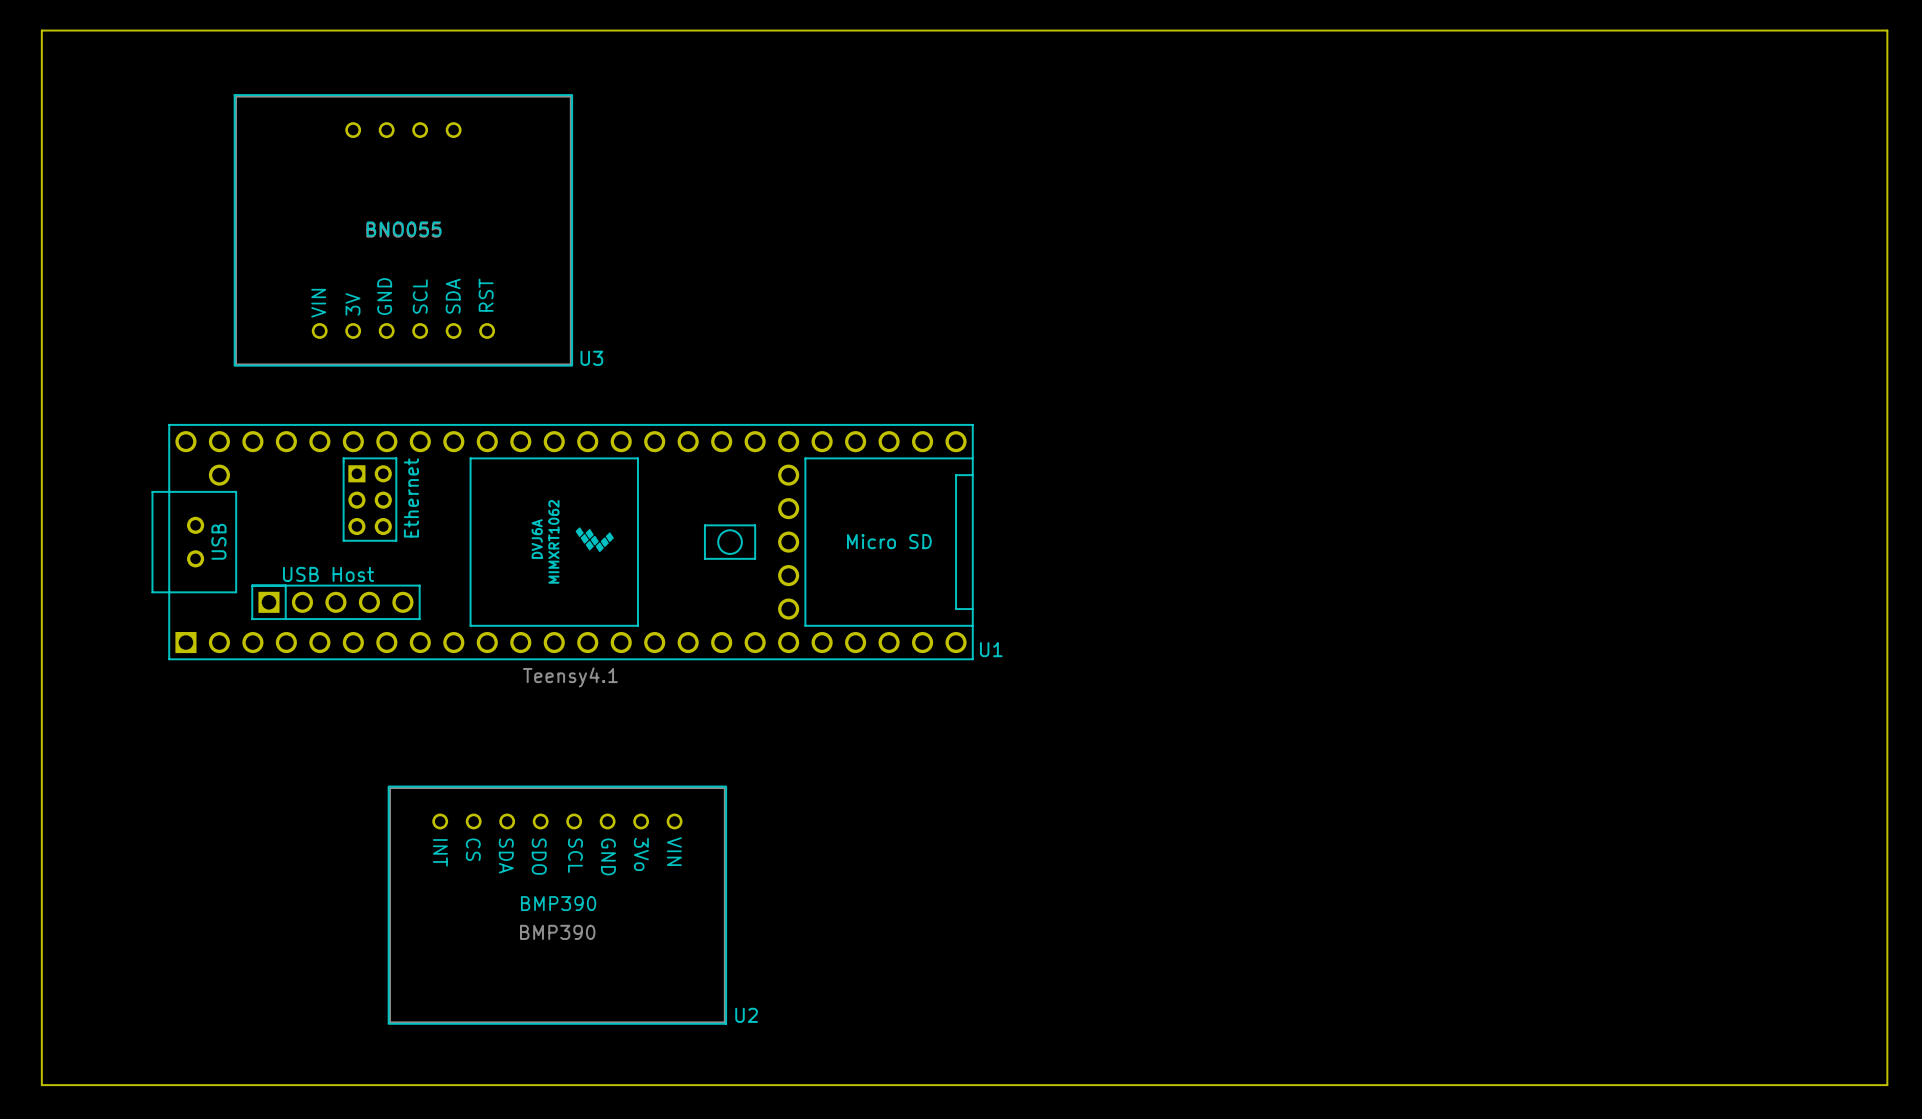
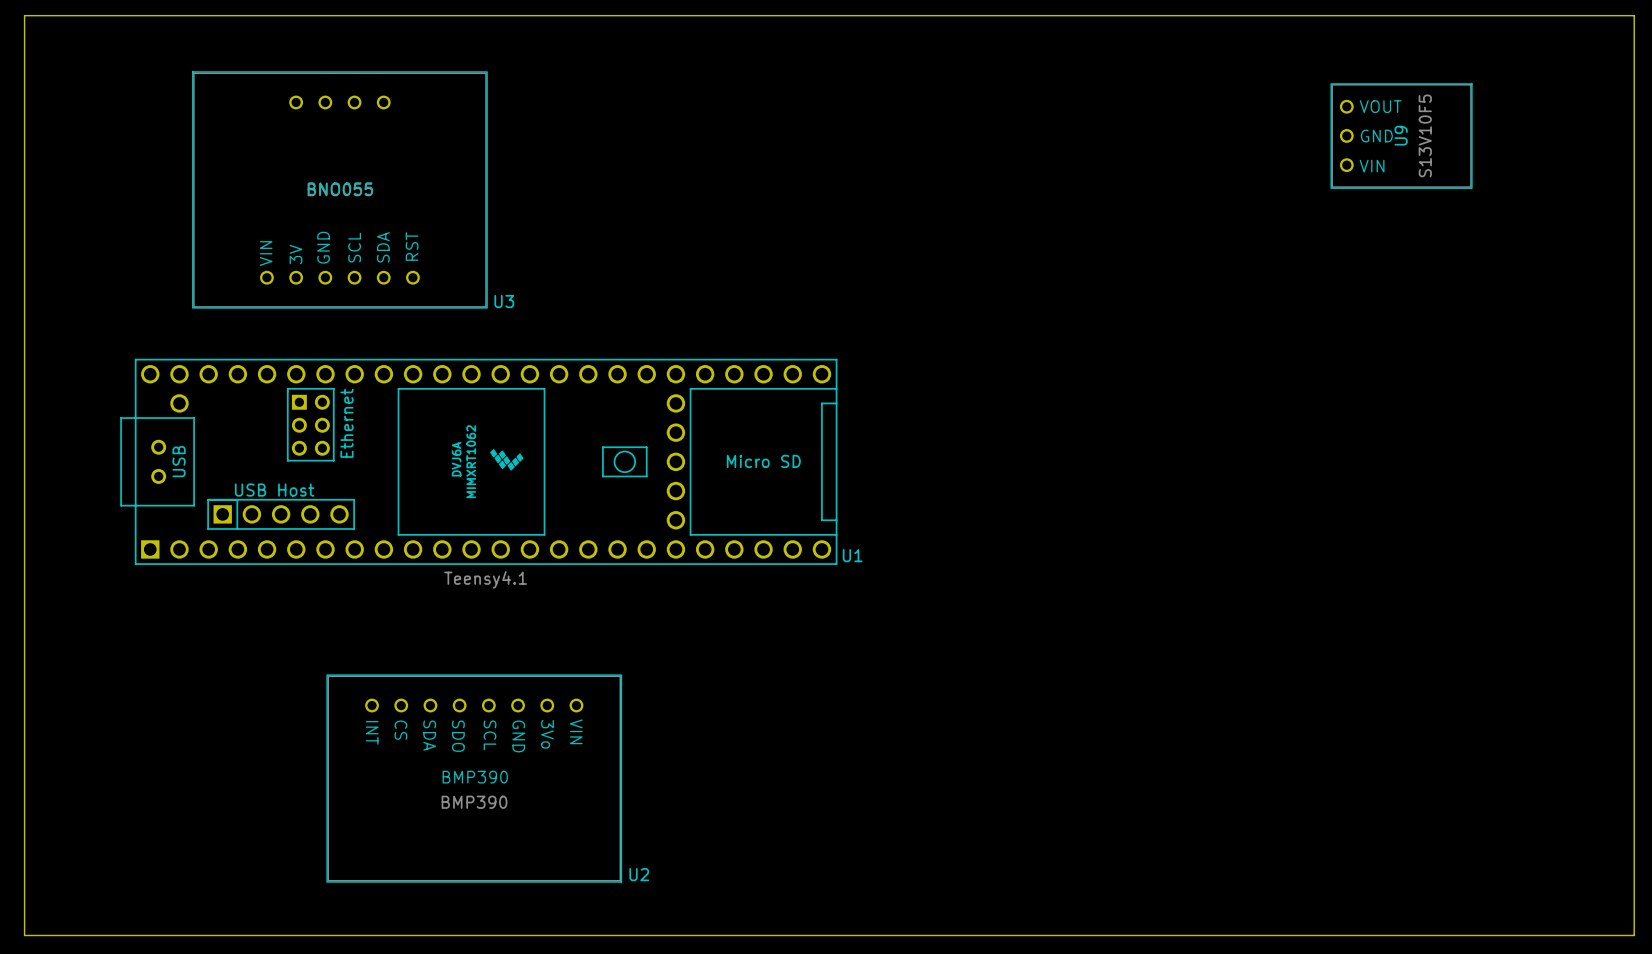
U9: none -> S13V10F5 (1401, 136)

